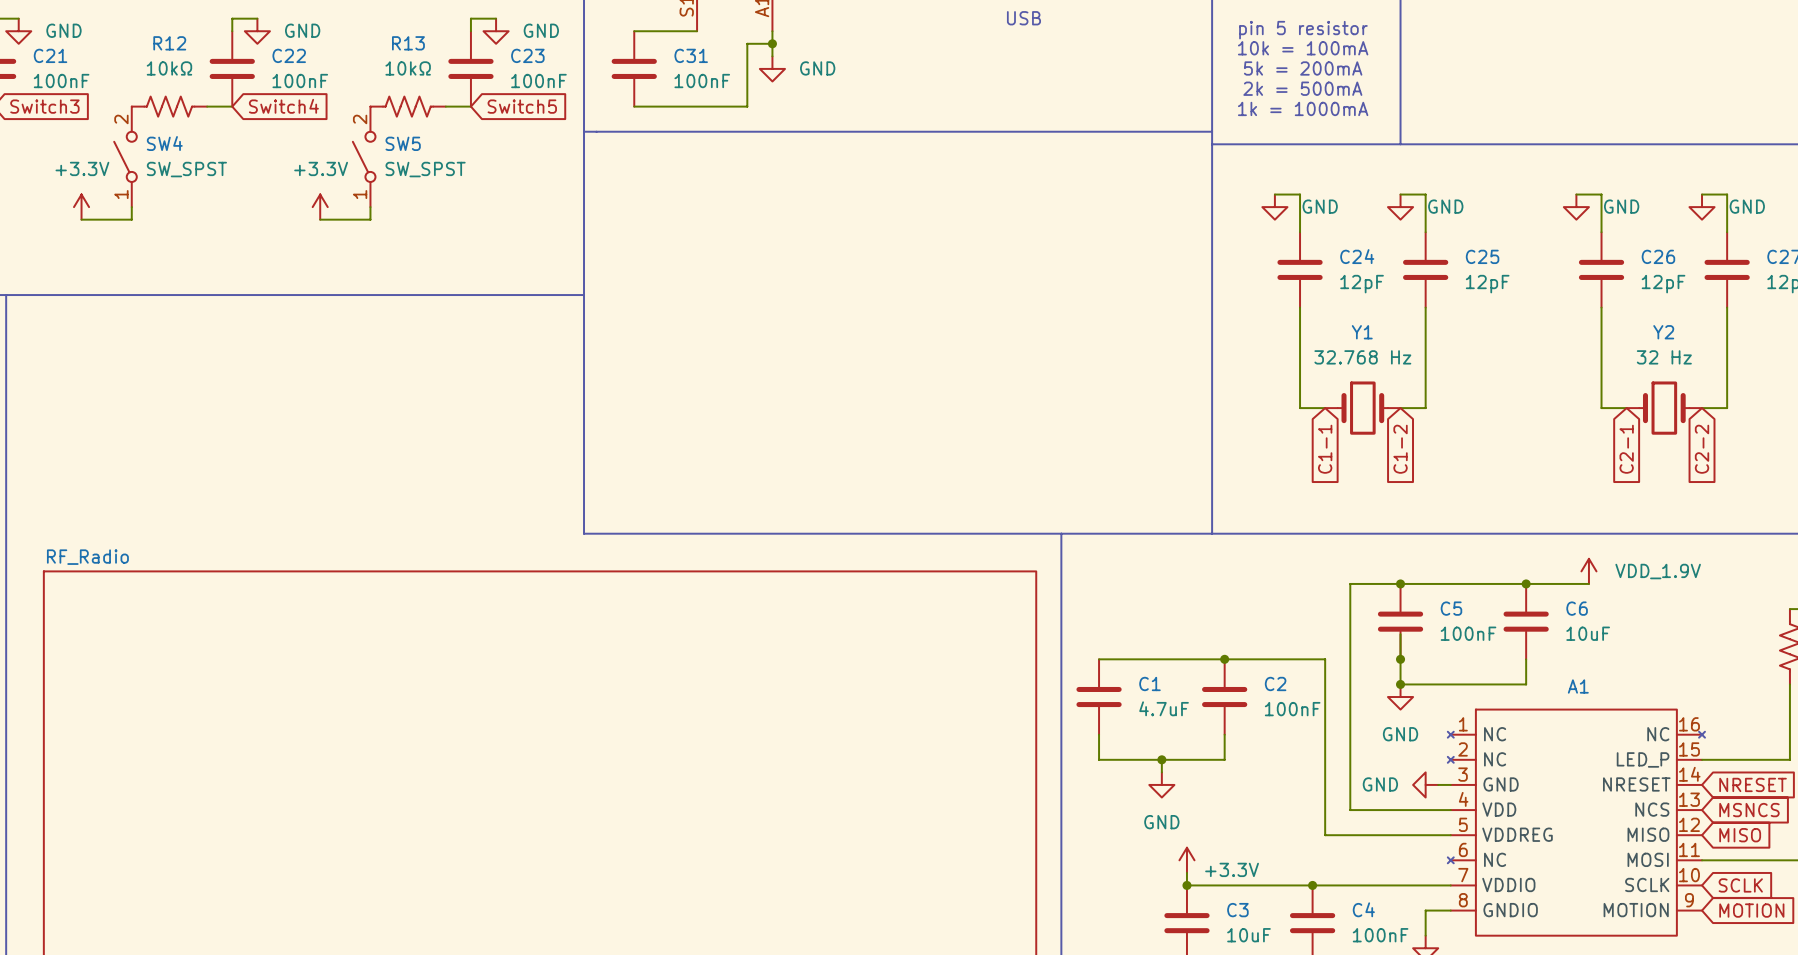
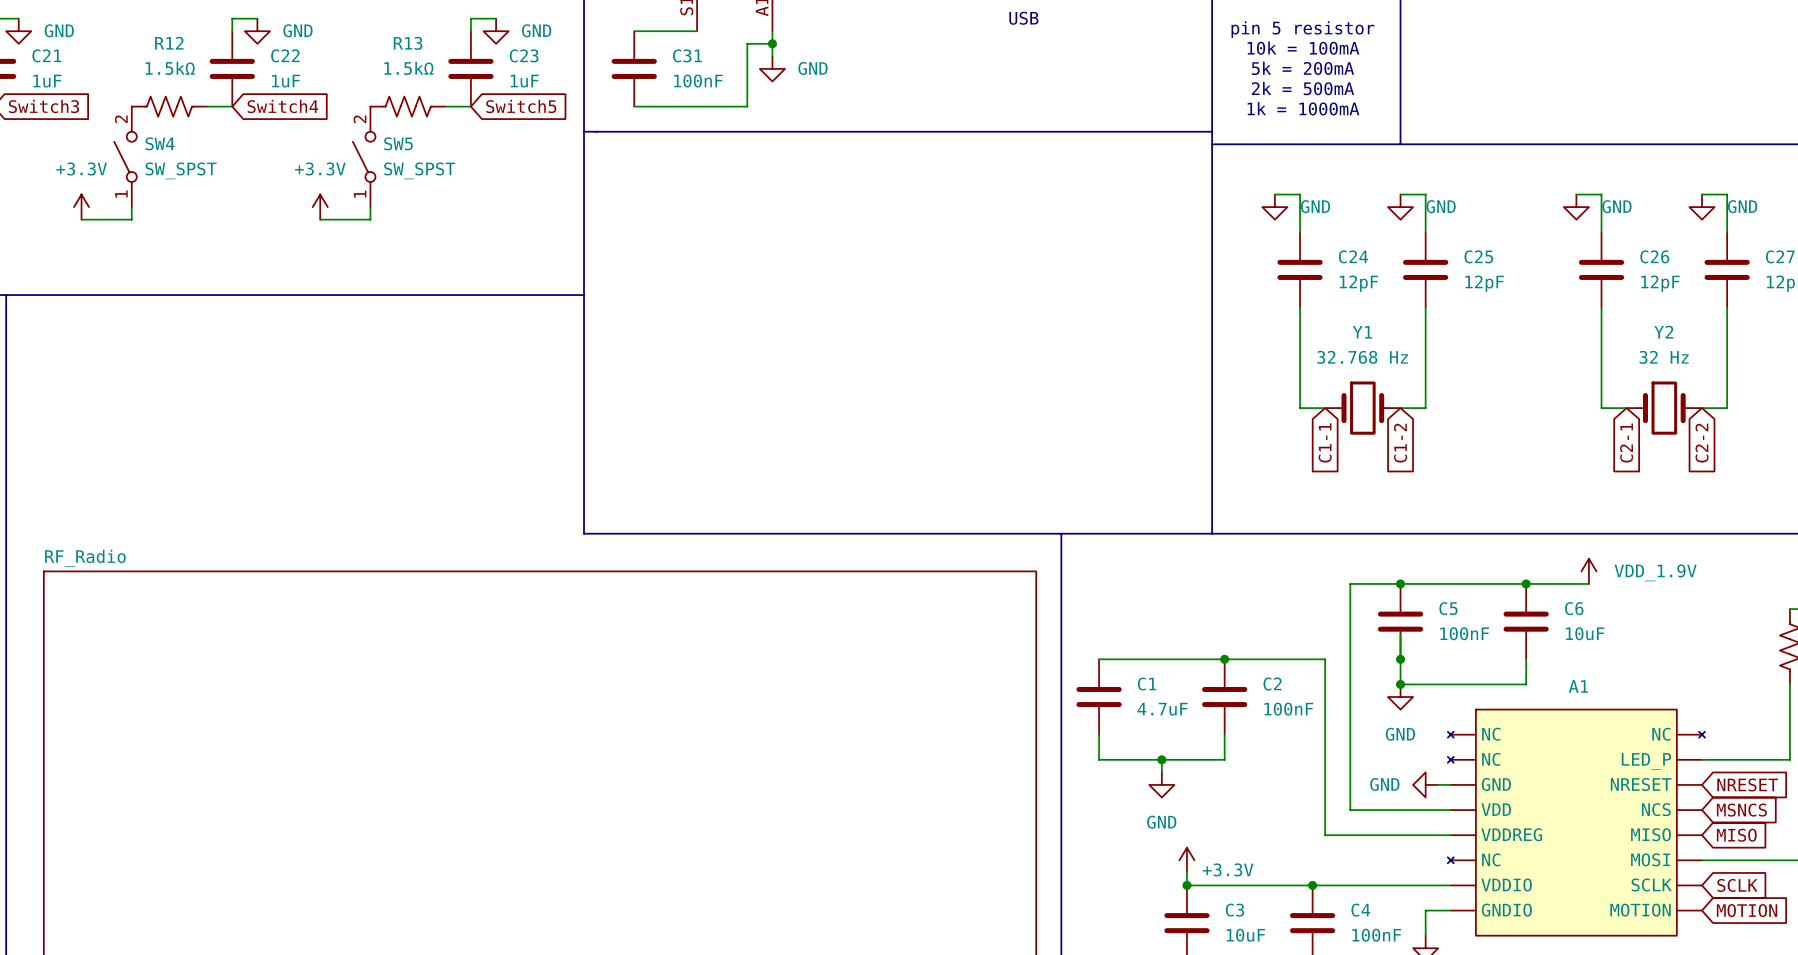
R12 value: 10kΩ (169, 68) -> 1.5kΩ (170, 68)
R13 value: 10kΩ (408, 68) -> 1.5kΩ (408, 68)
C21 value: 100nF (61, 81) -> 1uF (47, 81)
C22 value: 100nF (300, 81) -> 1uF (286, 81)
C23 value: 100nF (538, 81) -> 1uF (524, 81)
A1 symbol: [1447, 709, 1705, 936] -> [1447, 709, 1705, 936]

